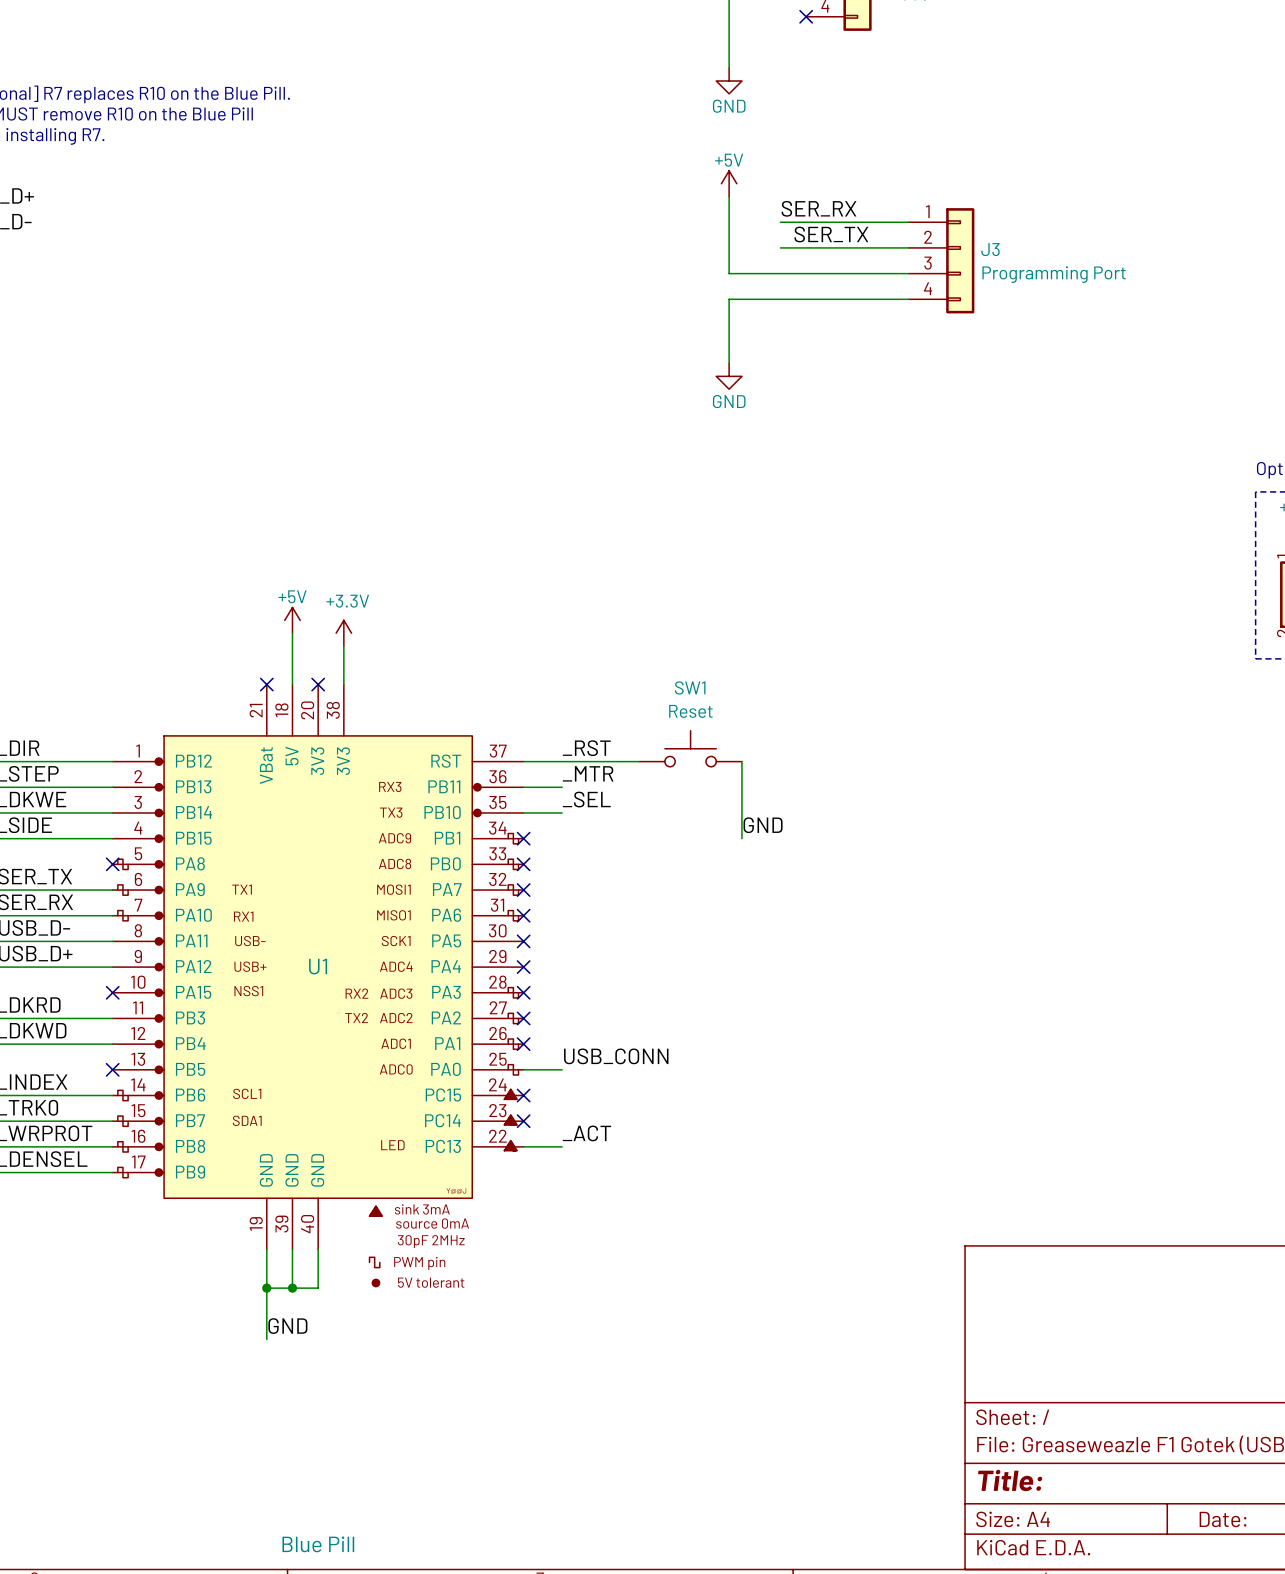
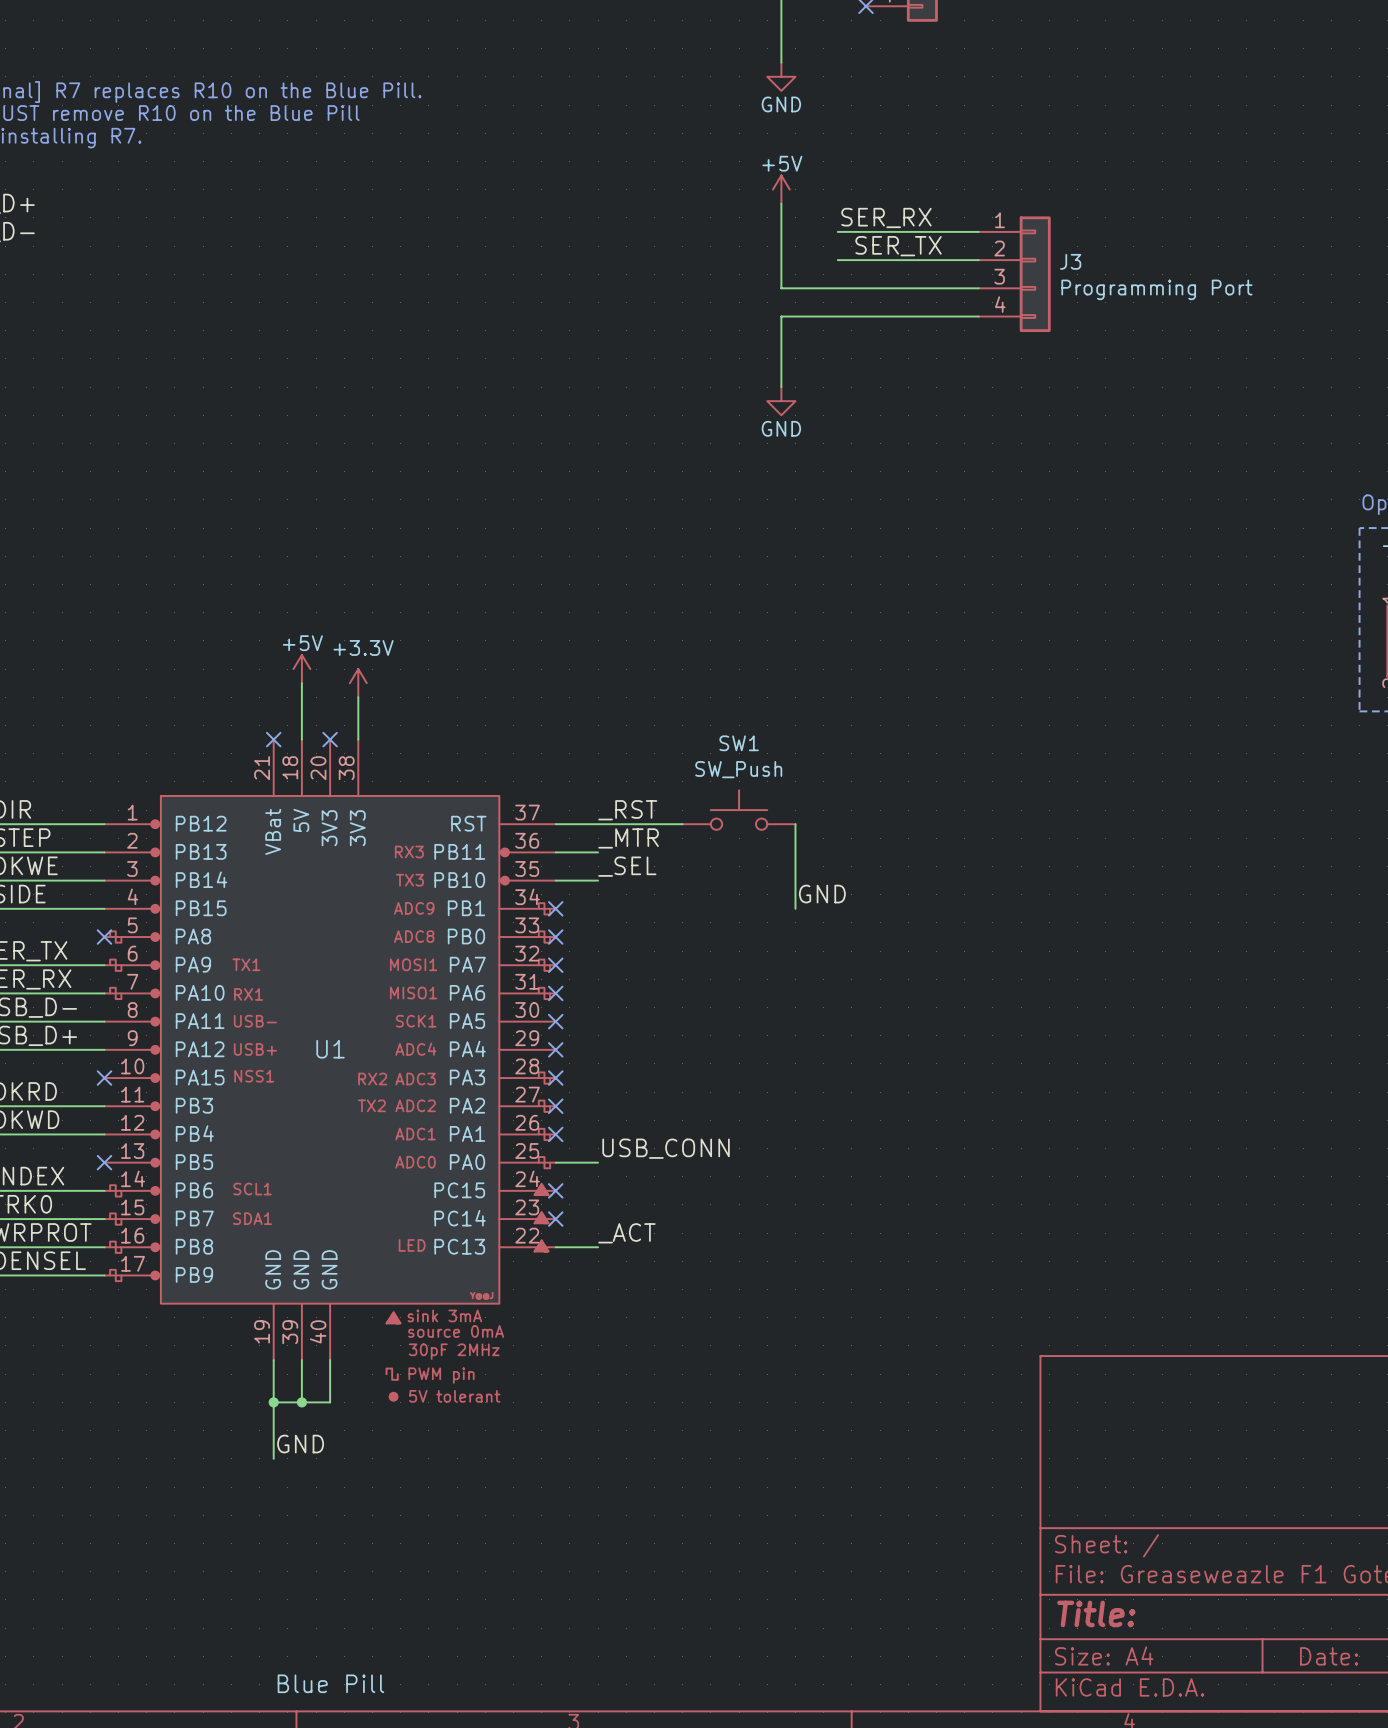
SW1 value: Reset (690, 711) -> SW_Push (738, 769)

